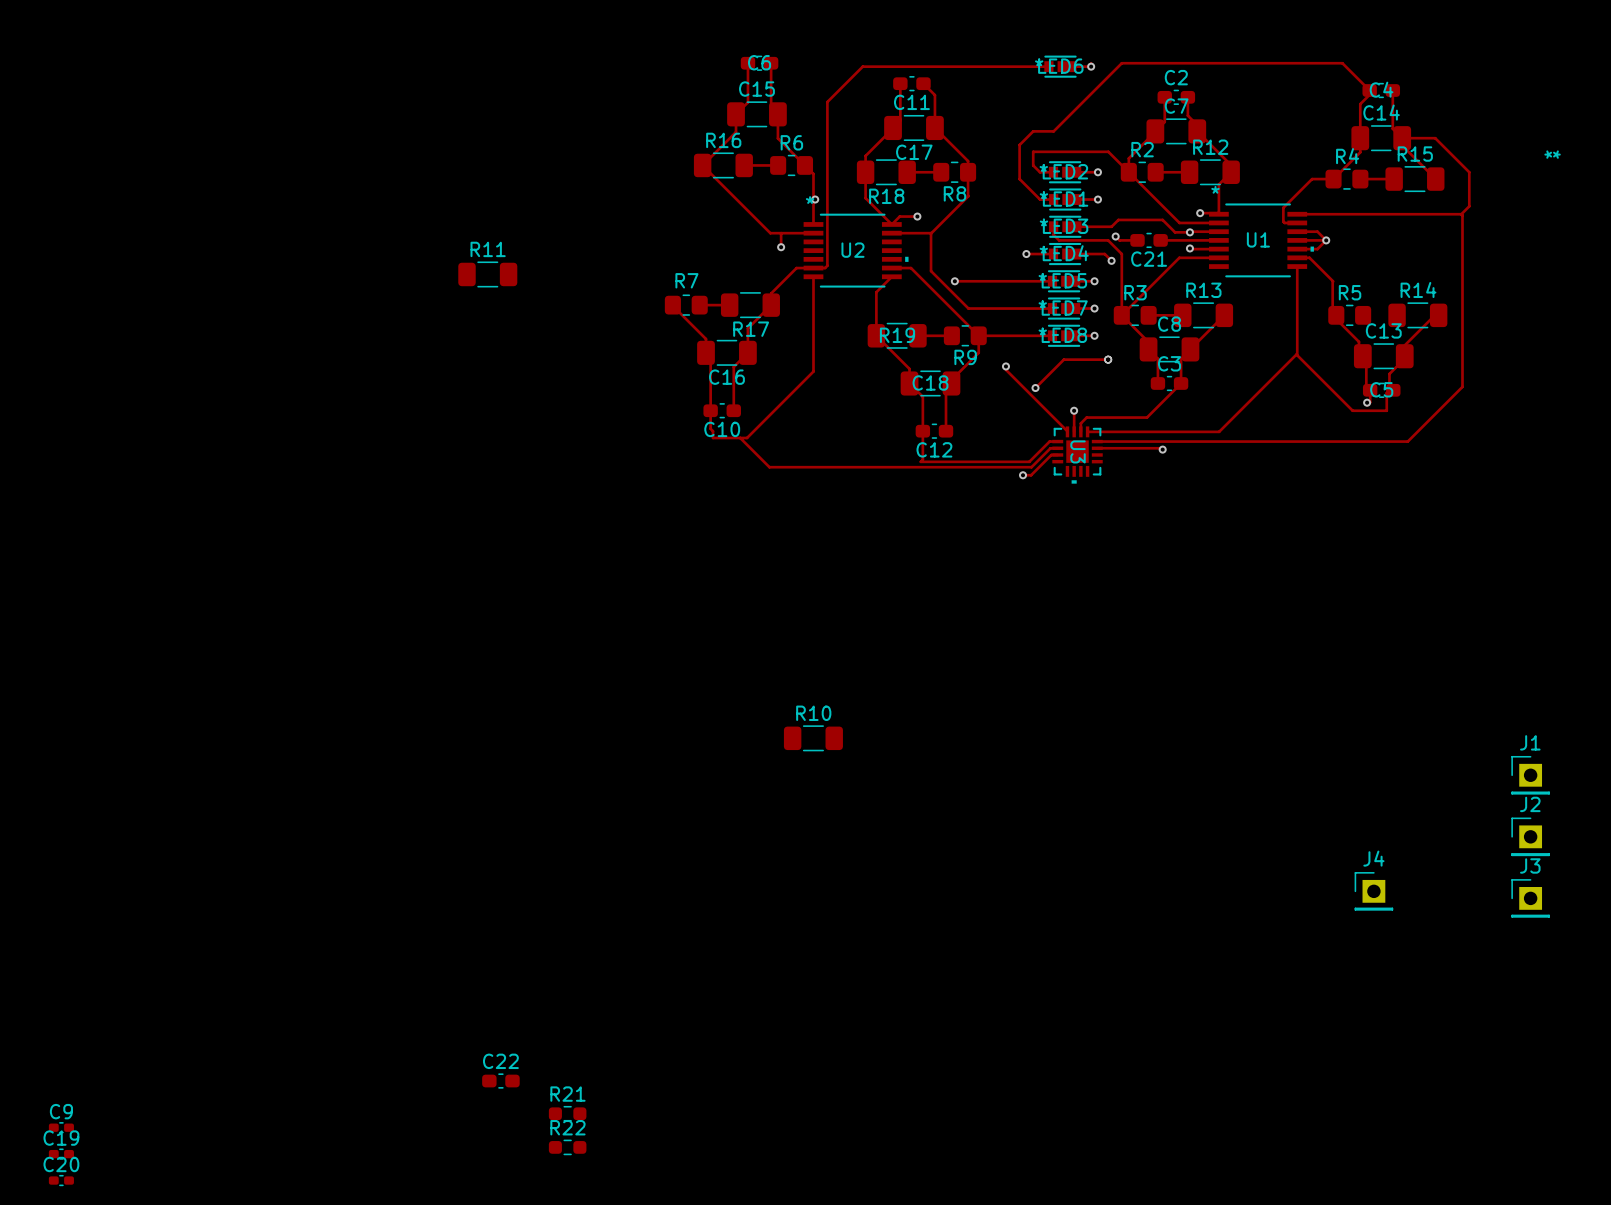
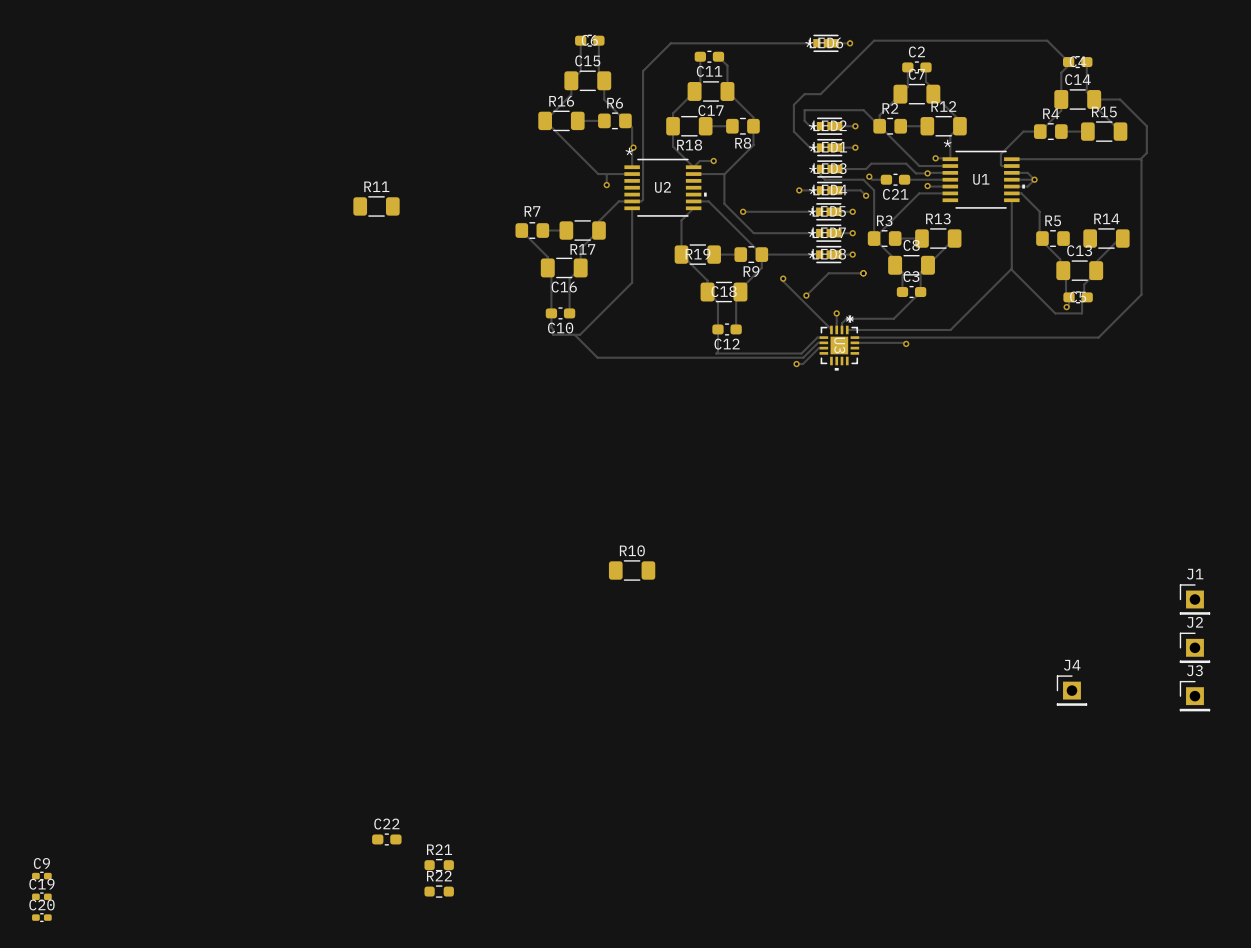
U3 footprint: [1052, 426, 1103, 484] -> [819, 325, 860, 371]

